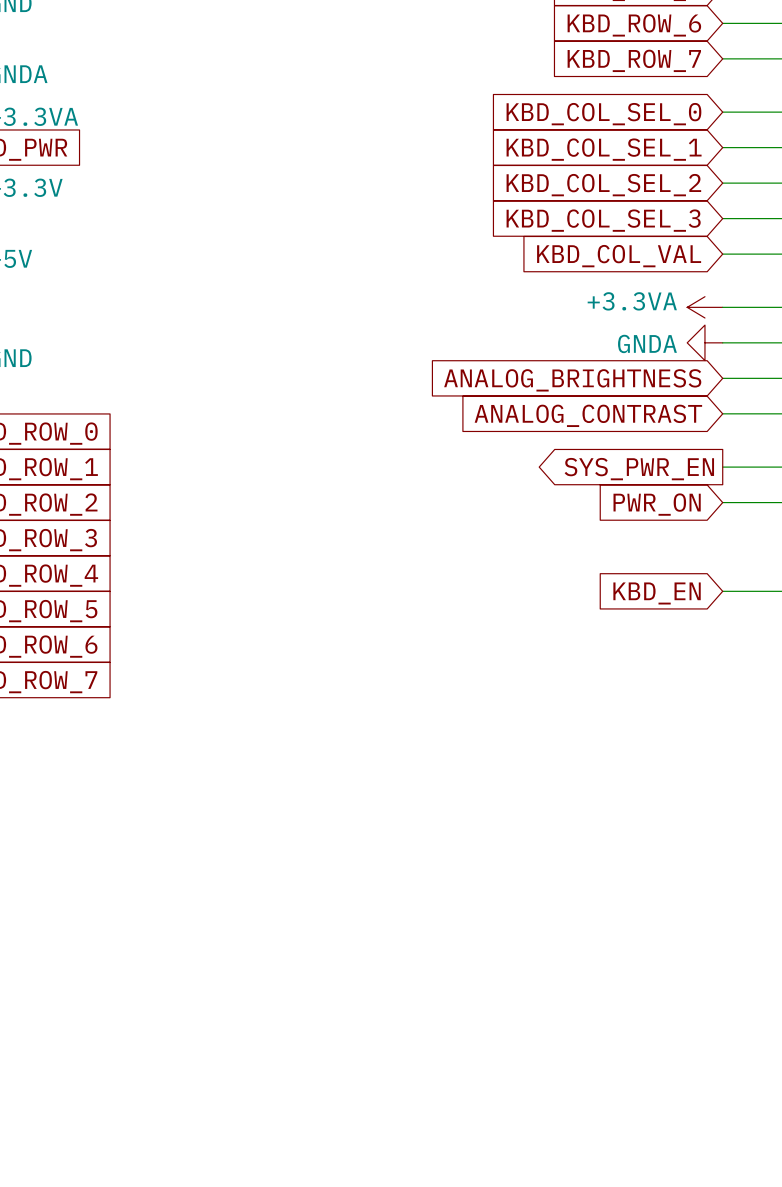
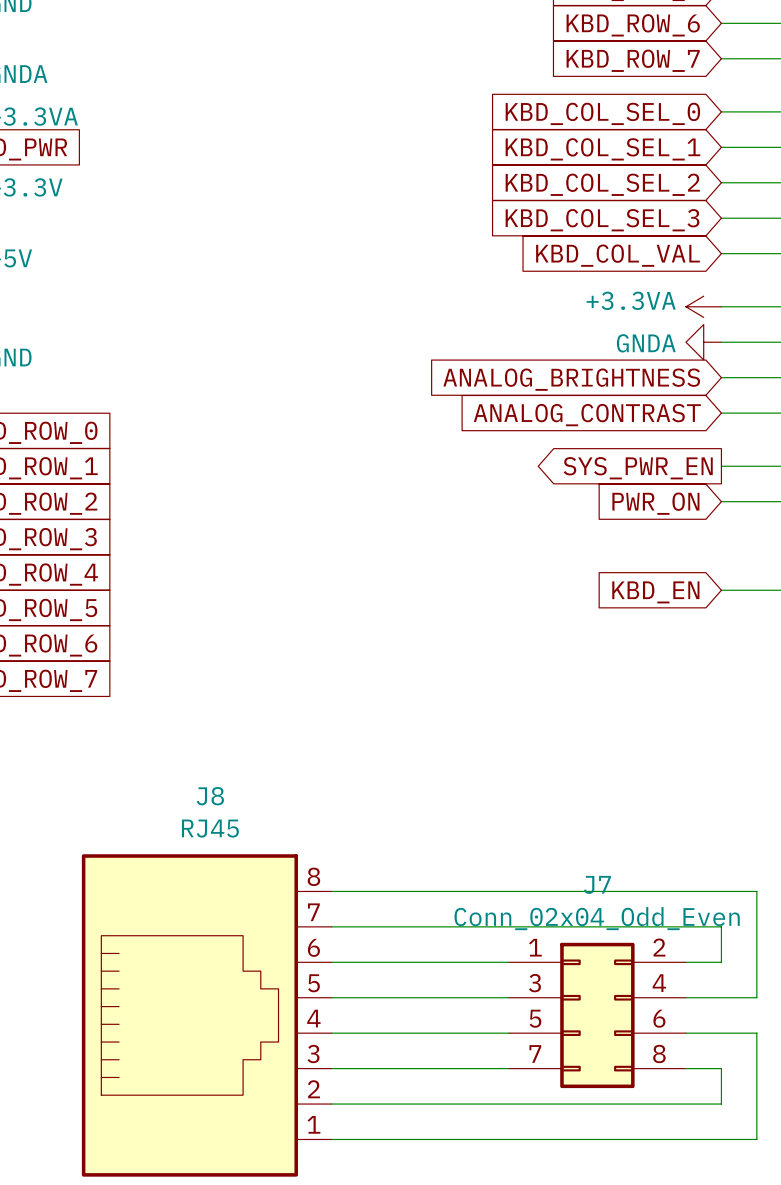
wire: none -> (331, 891) (756, 891) (756, 997) (685, 997)
wire: none -> (331, 926) (721, 926) (721, 962) (685, 962)
wire: none -> (331, 962) (508, 962)
wire: none -> (331, 997) (508, 997)
J8: none -> RJ45 (206, 1015)
J7: none -> Conn_02x04_Odd_Even (597, 1015)
wire: none -> (331, 1033) (508, 1033)
wire: none -> (685, 1033) (756, 1033) (756, 1139) (331, 1139)
wire: none -> (331, 1068) (508, 1068)
wire: none -> (685, 1068) (721, 1068) (721, 1104) (331, 1104)

